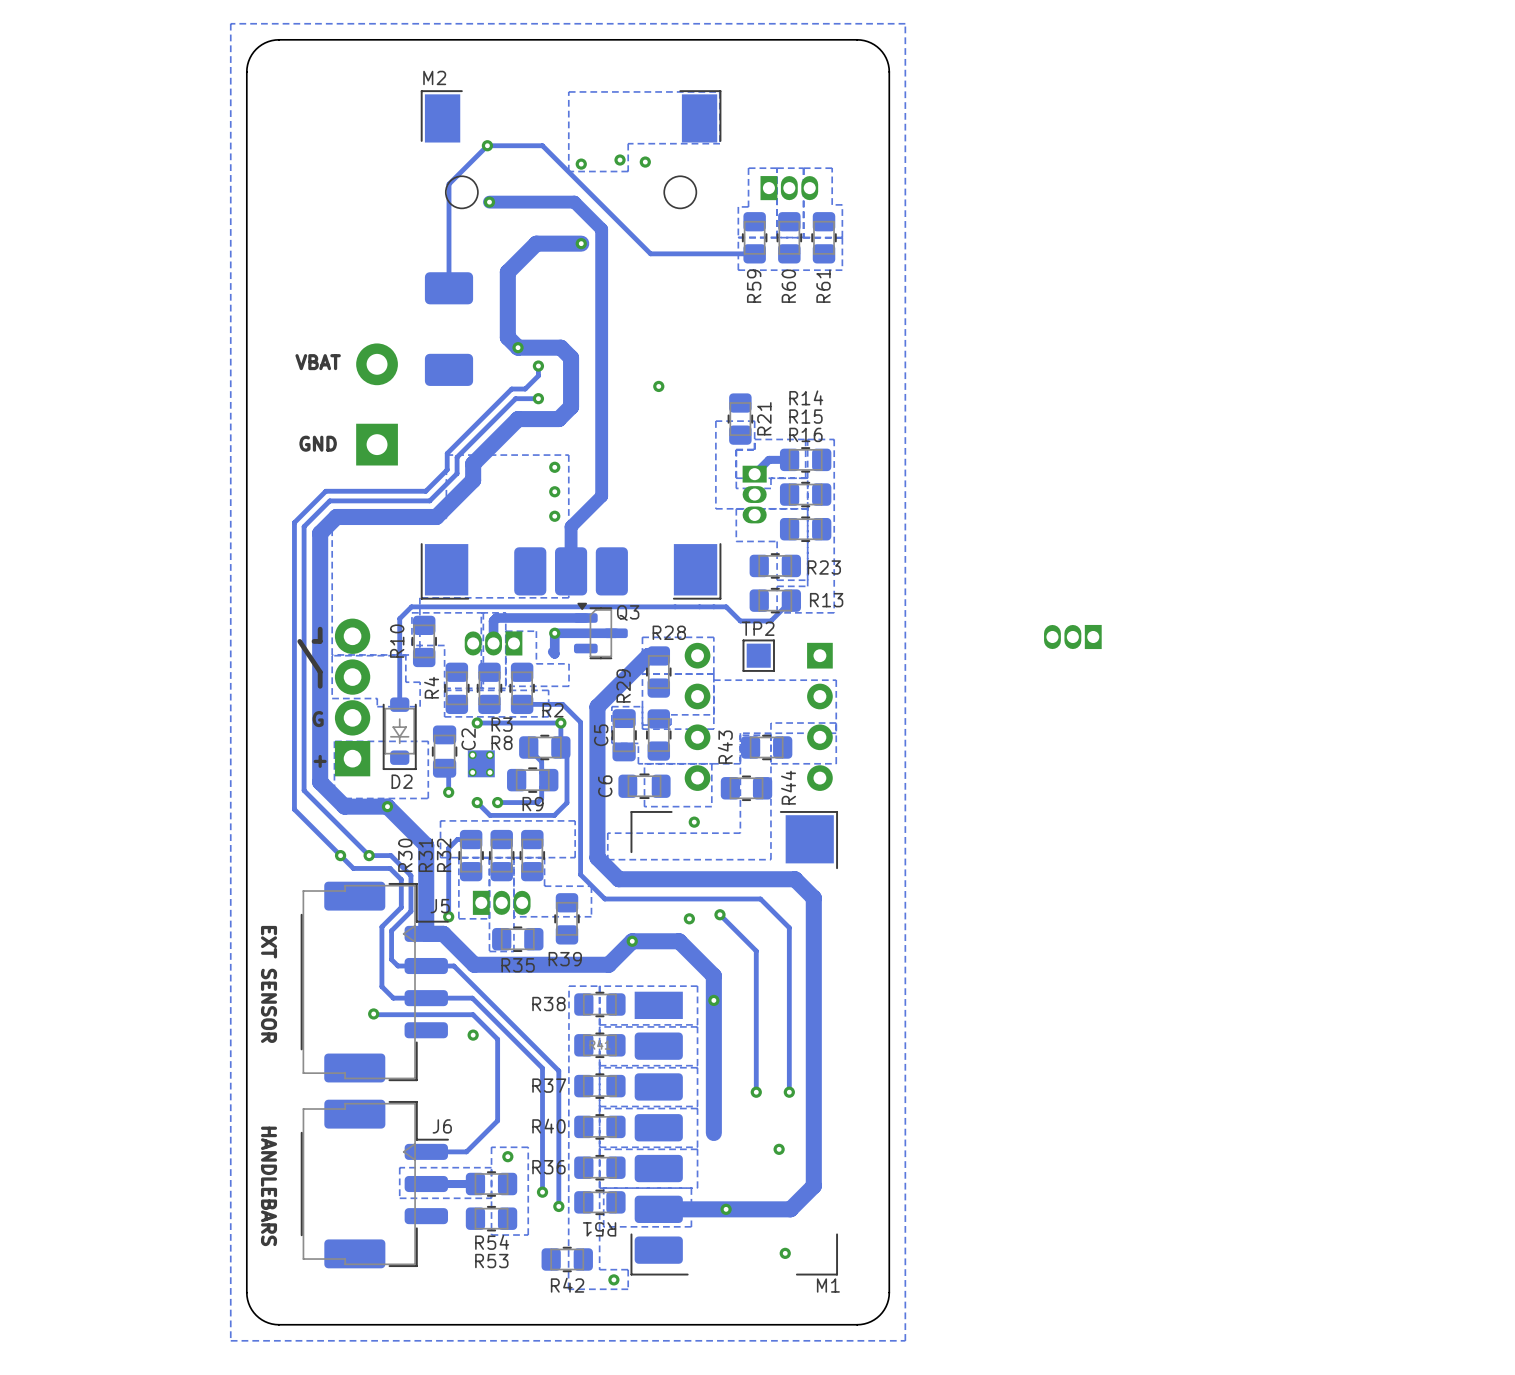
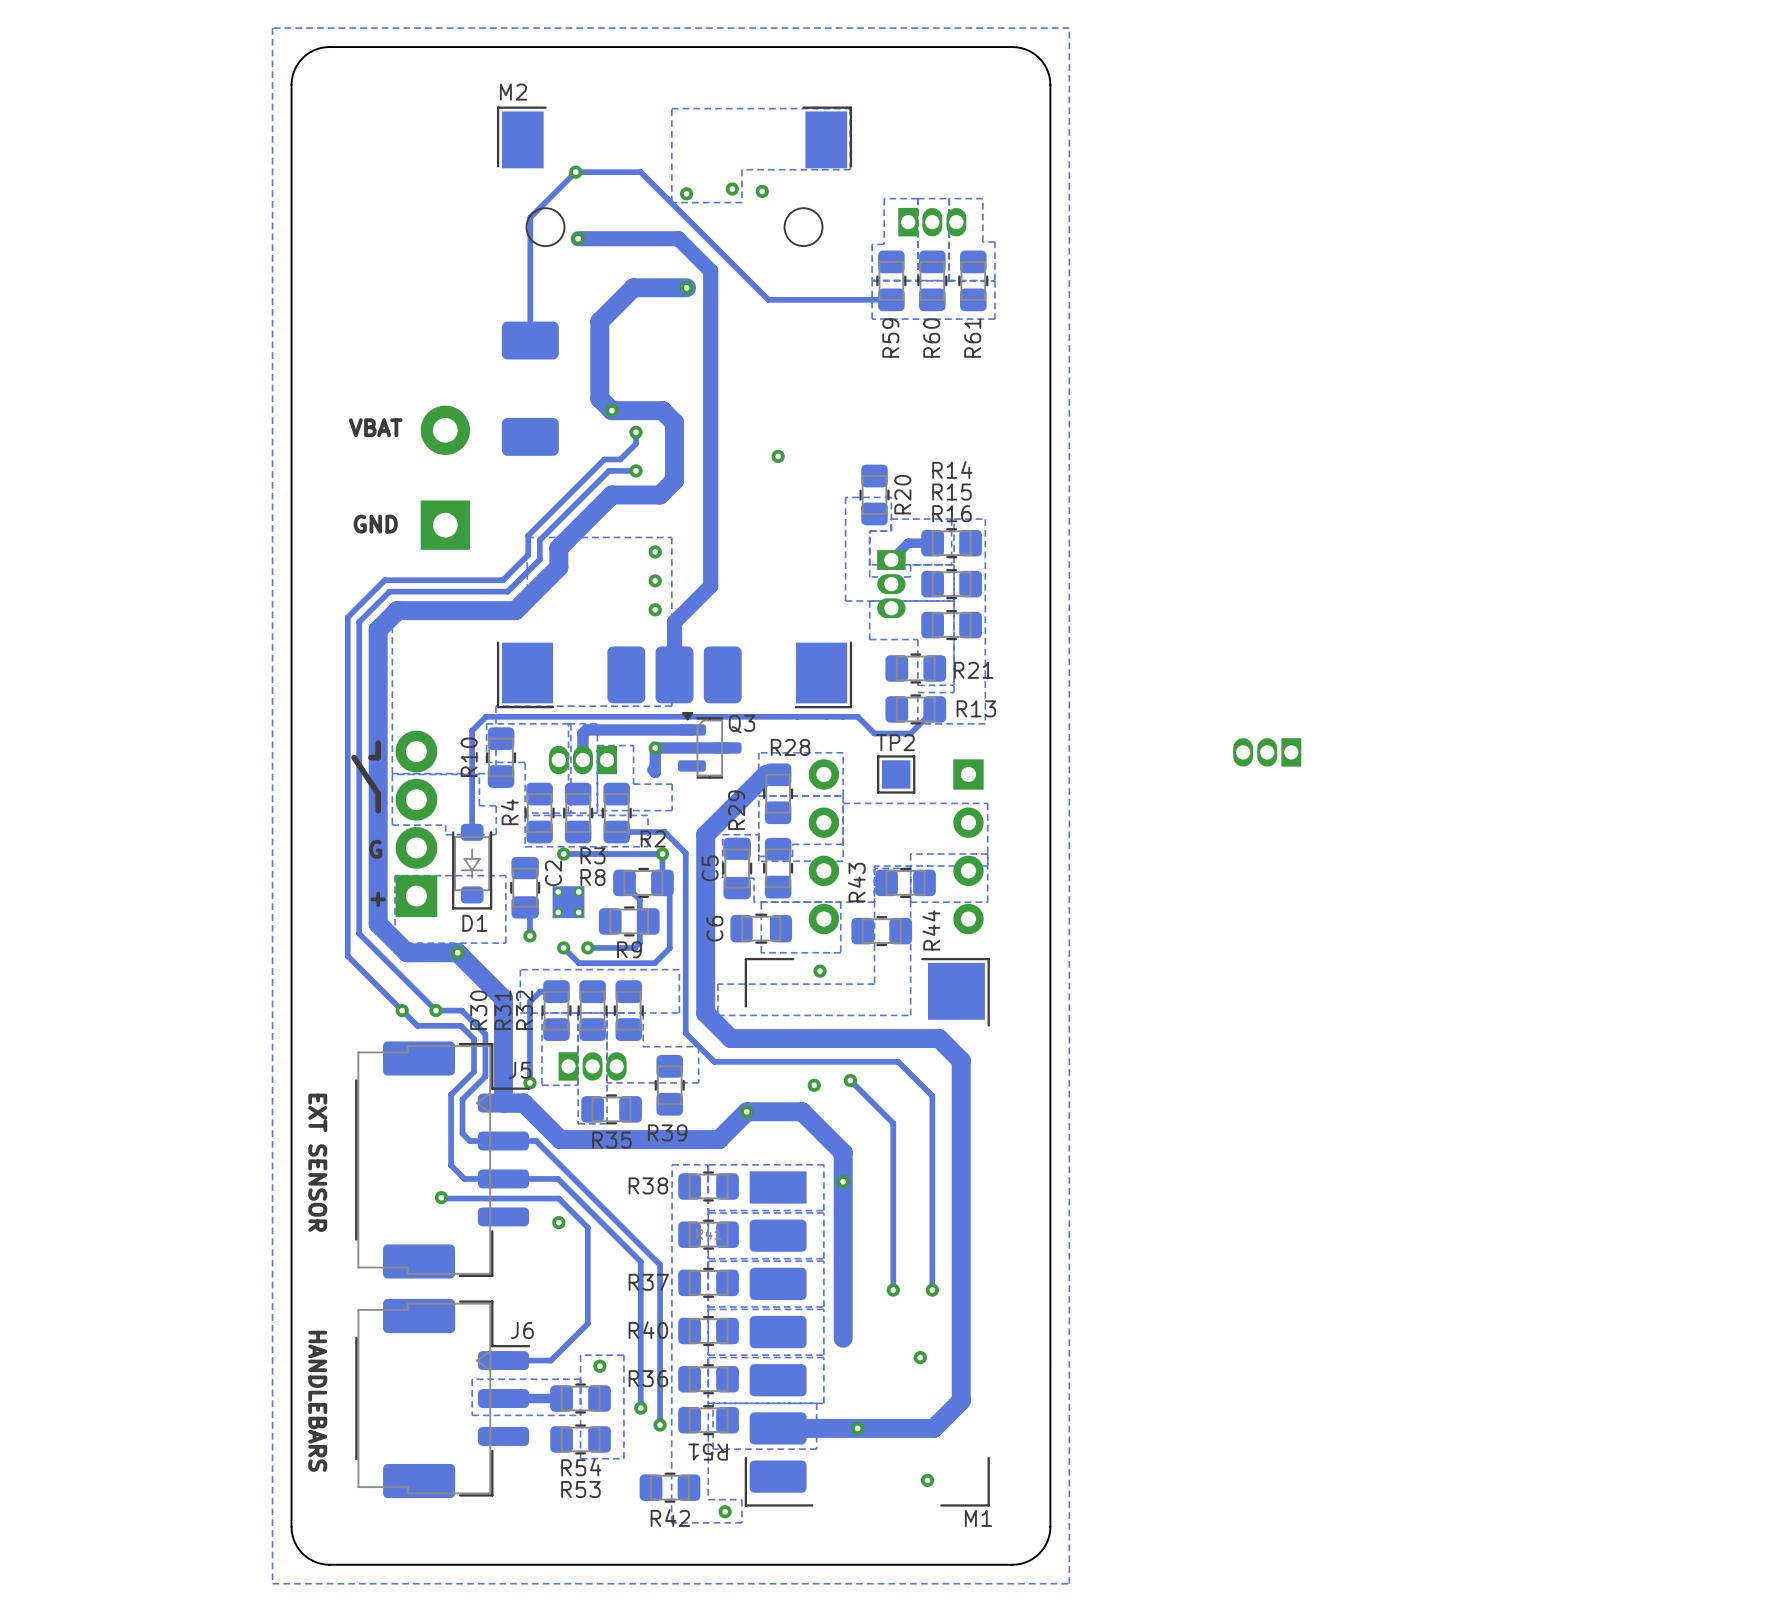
R21 name: R21 (764, 418) -> R20 (902, 494)
R23 name: R23 (824, 567) -> R21 (973, 670)
D2 name: D2 (402, 781) -> D1 (474, 923)

